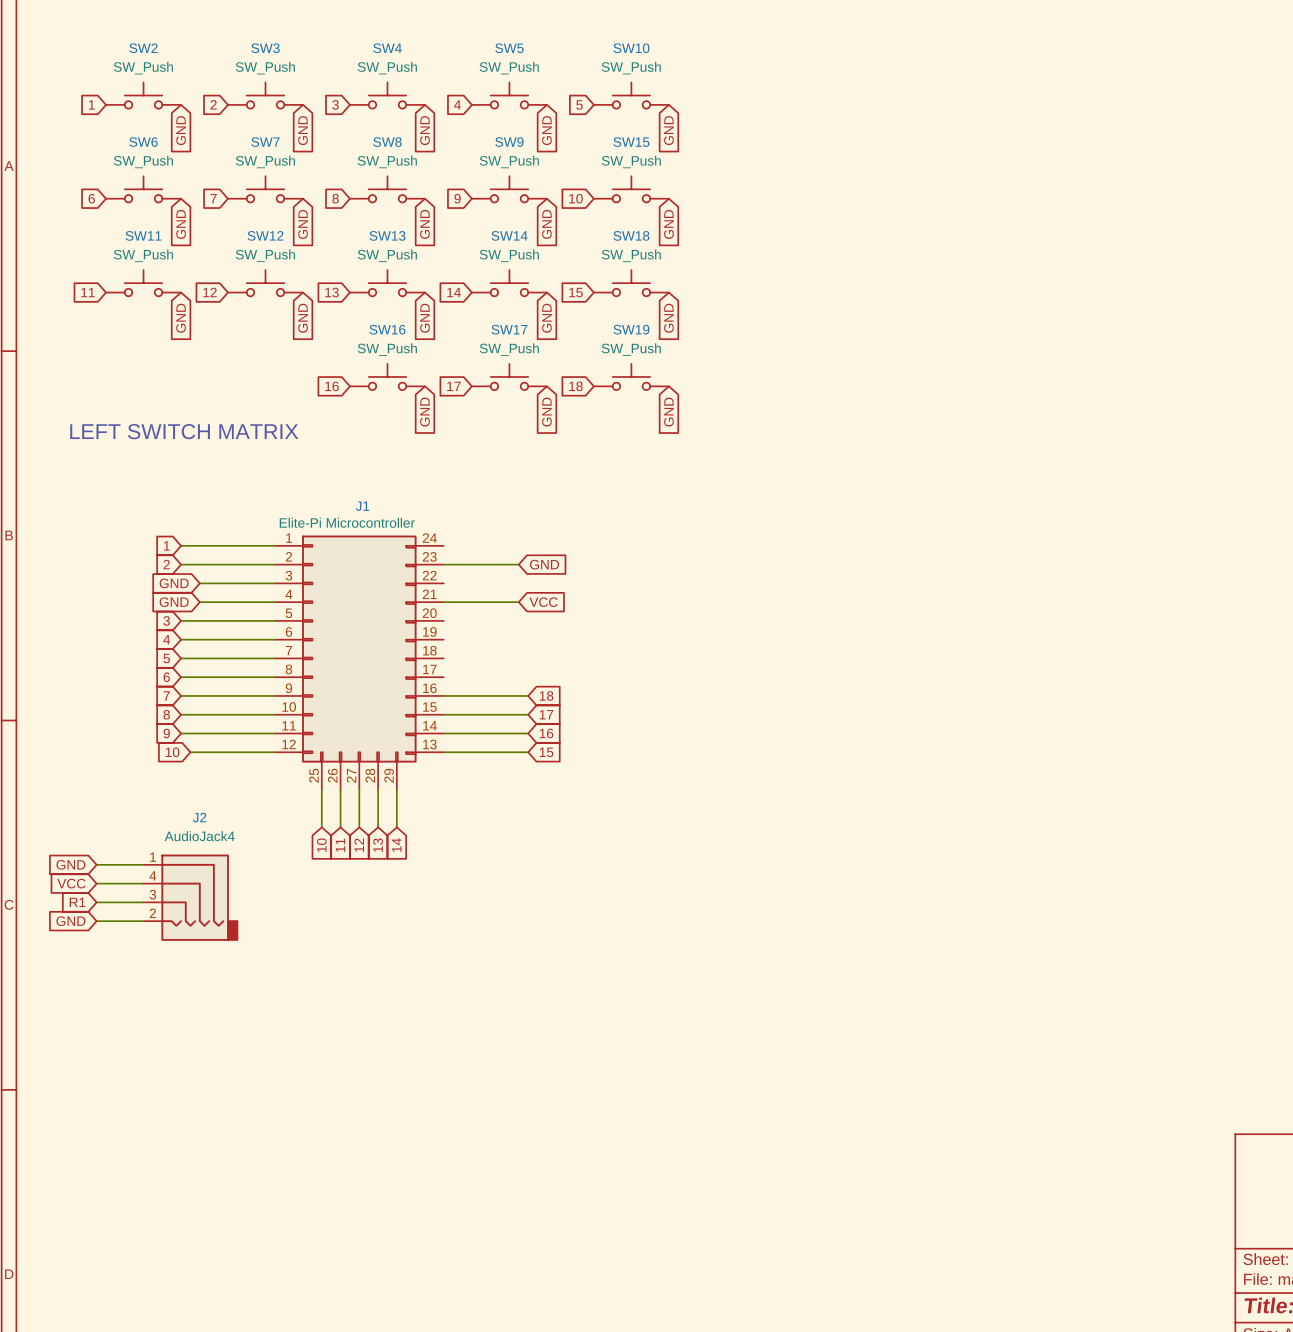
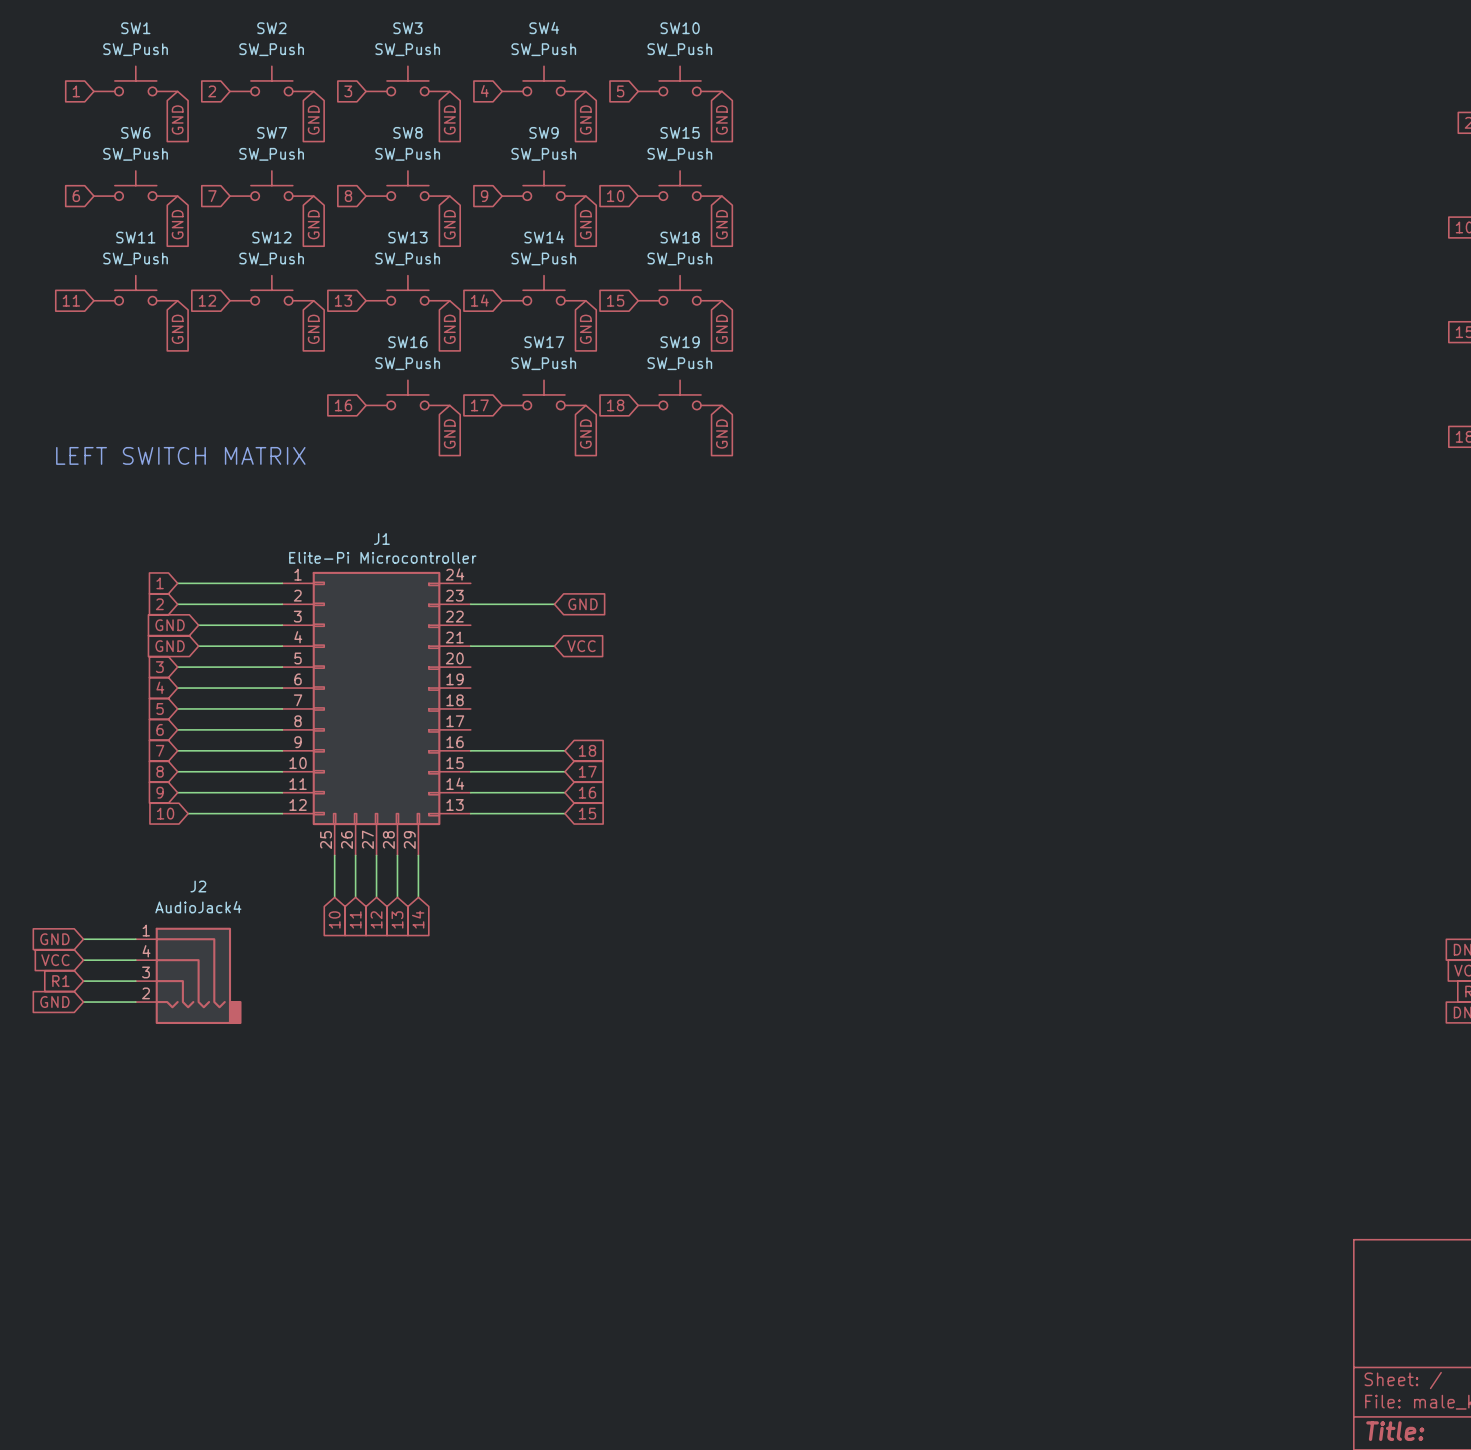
SW2 name: SW2 (143, 48) -> SW1 (135, 28)
SW3 name: SW3 (265, 48) -> SW2 (271, 28)
SW4 name: SW4 (387, 48) -> SW3 (407, 28)
SW5 name: SW5 (509, 48) -> SW4 (544, 27)

